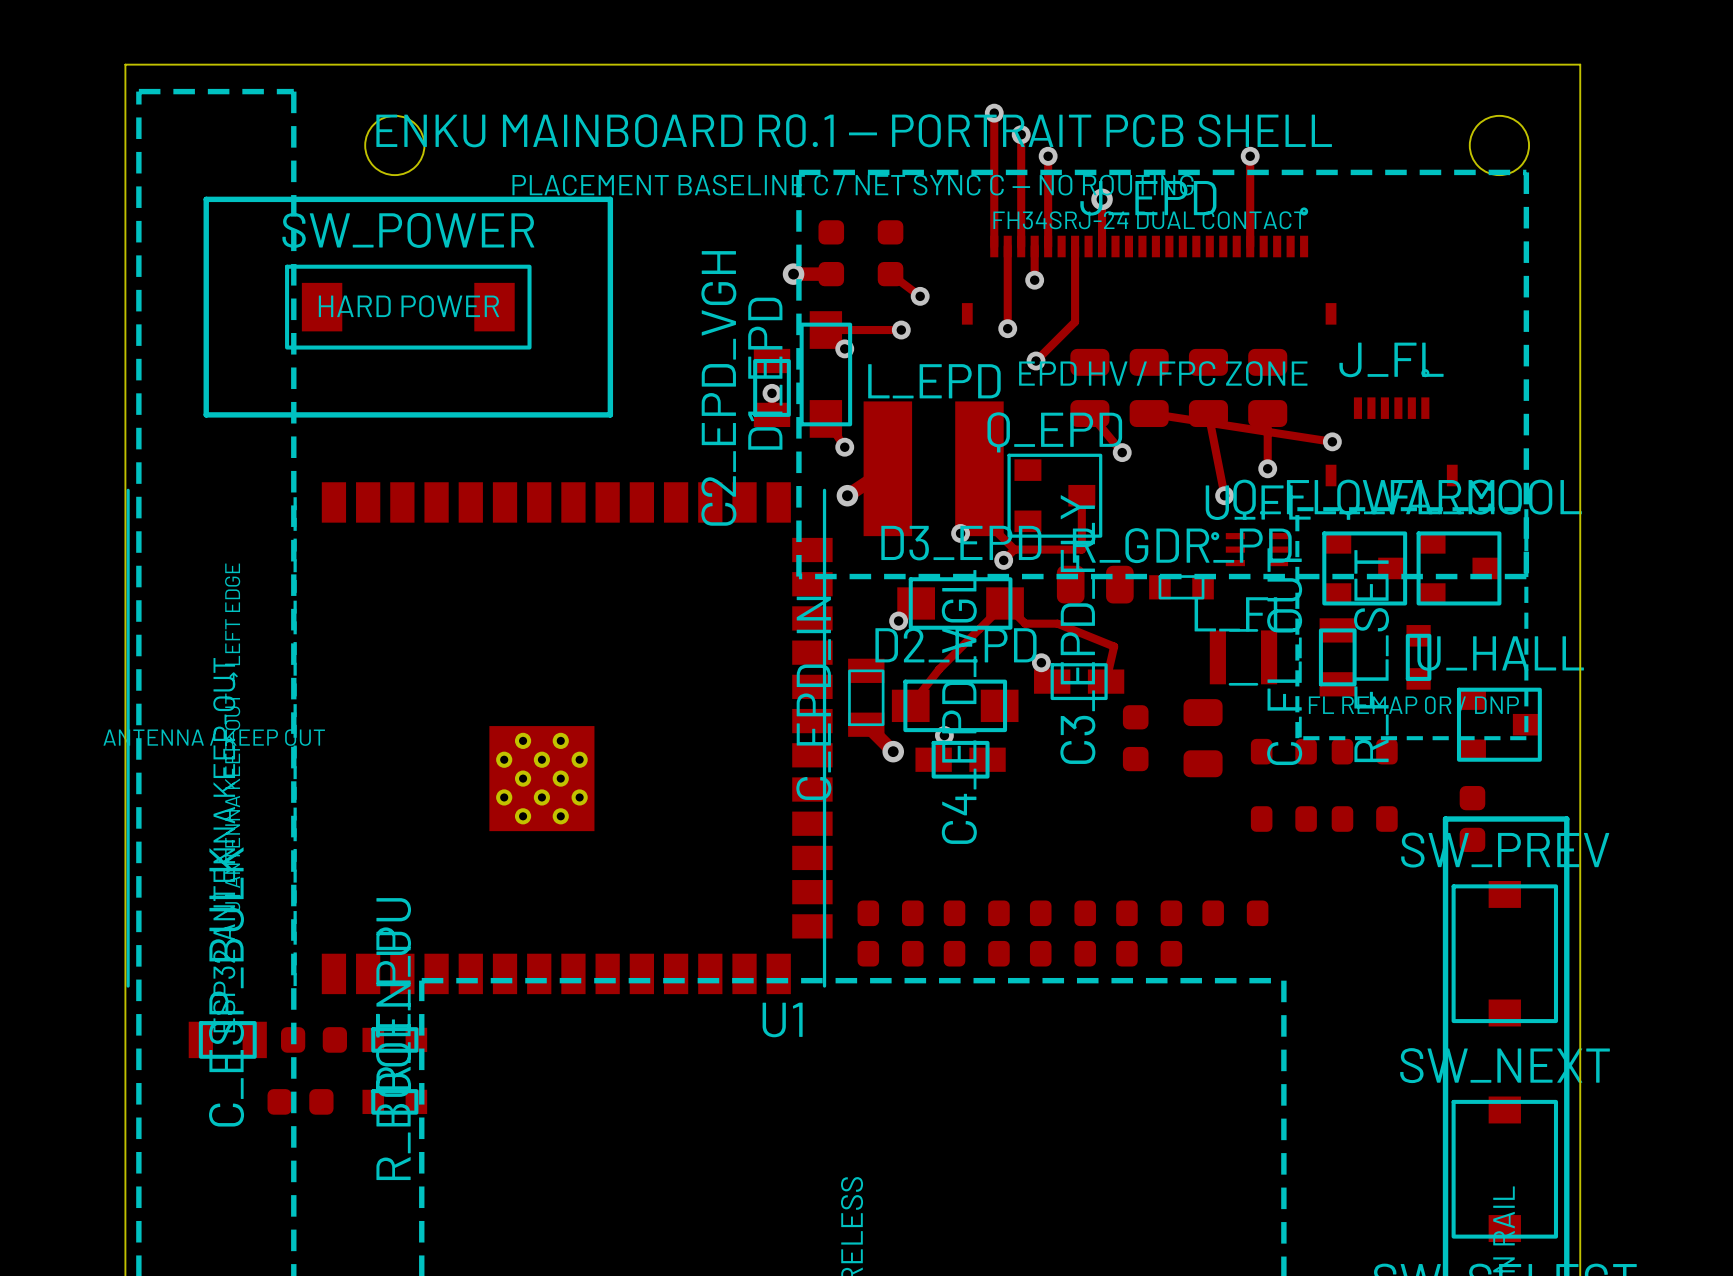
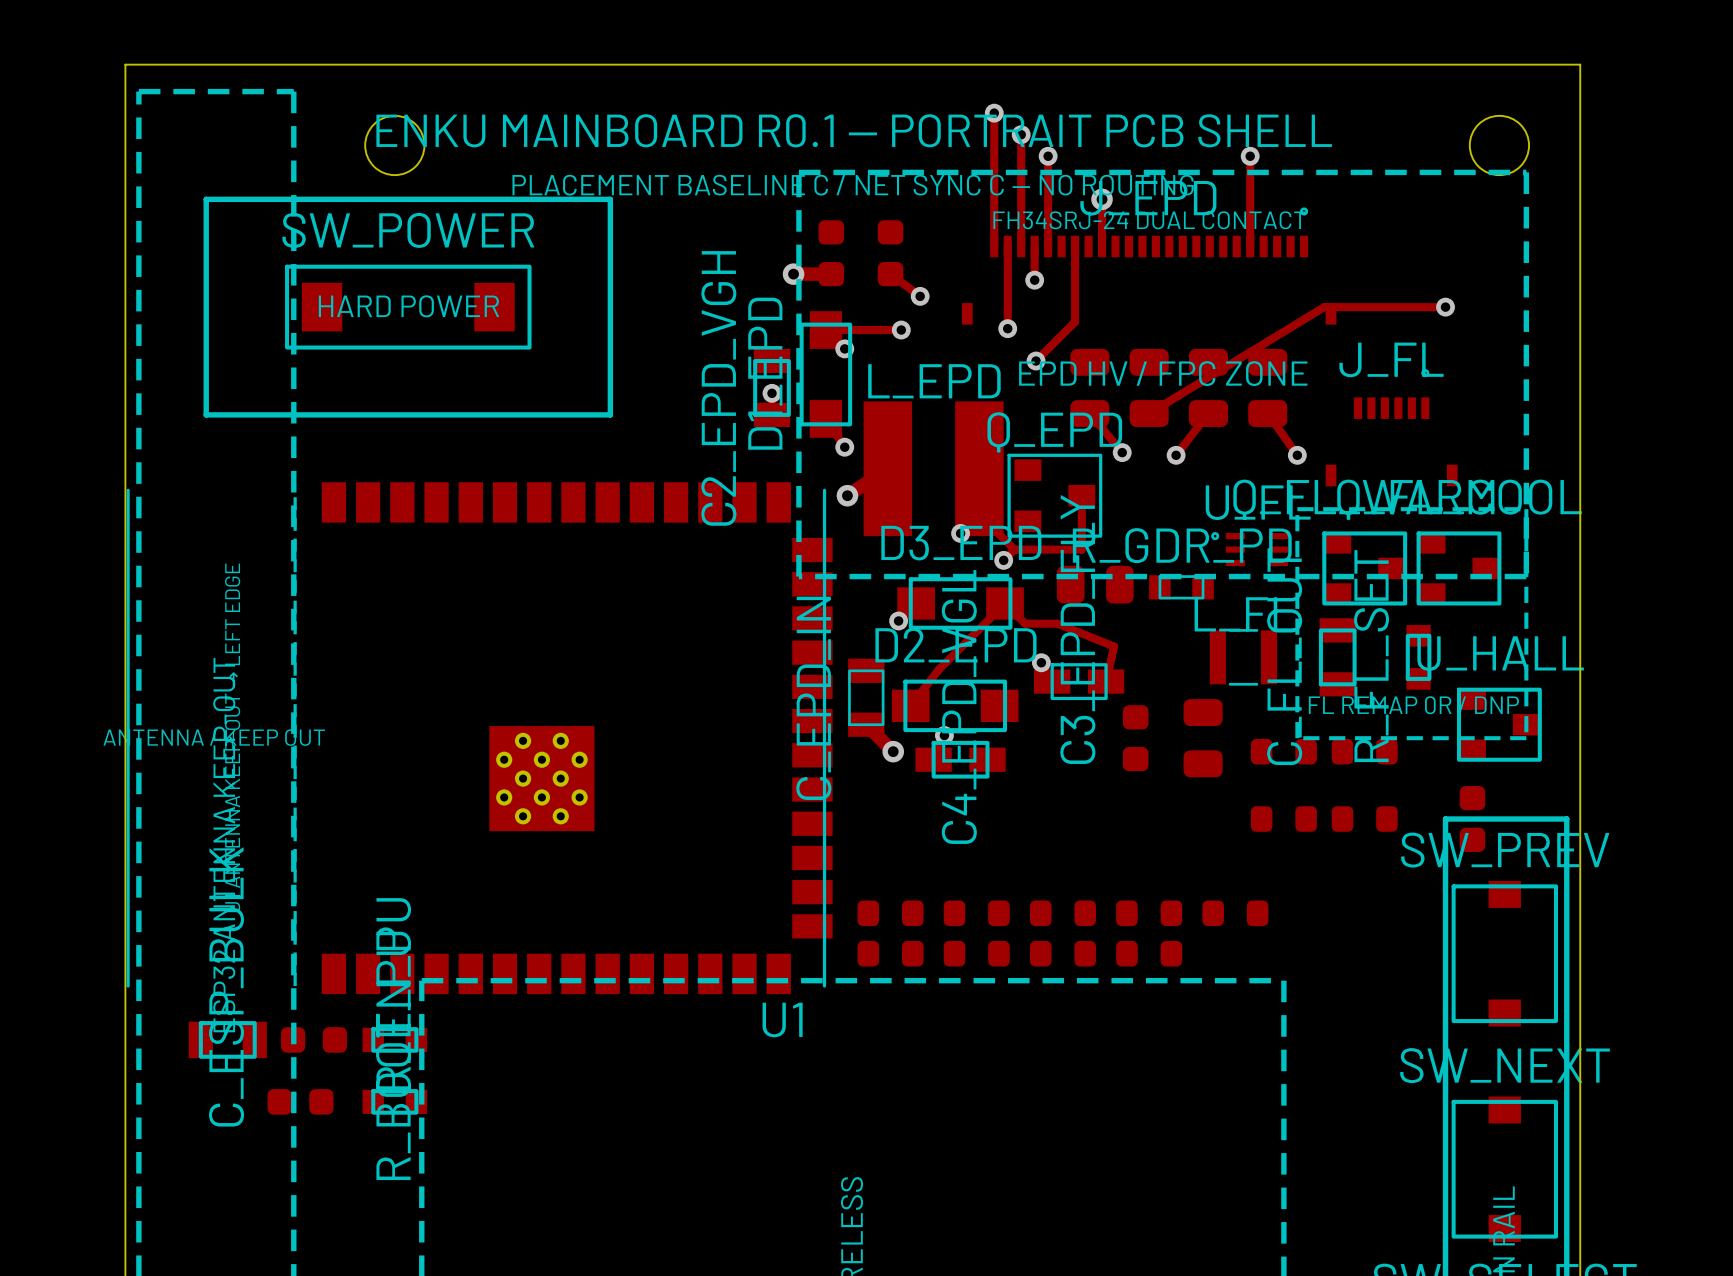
via: none -> (1445, 307)
track: (1149, 413) (1332, 441) -> (1149, 413) (1324, 307) (1445, 307)
track: (1208, 413) (1224, 495) -> (1208, 413) (1176, 455)
track: (1267, 413) (1267, 468) -> (1267, 413) (1297, 455)
via: (1332, 441) -> none
via: none -> (1176, 455)
via: none -> (1297, 455)
via: (1267, 468) -> none
via: (1224, 495) -> none

